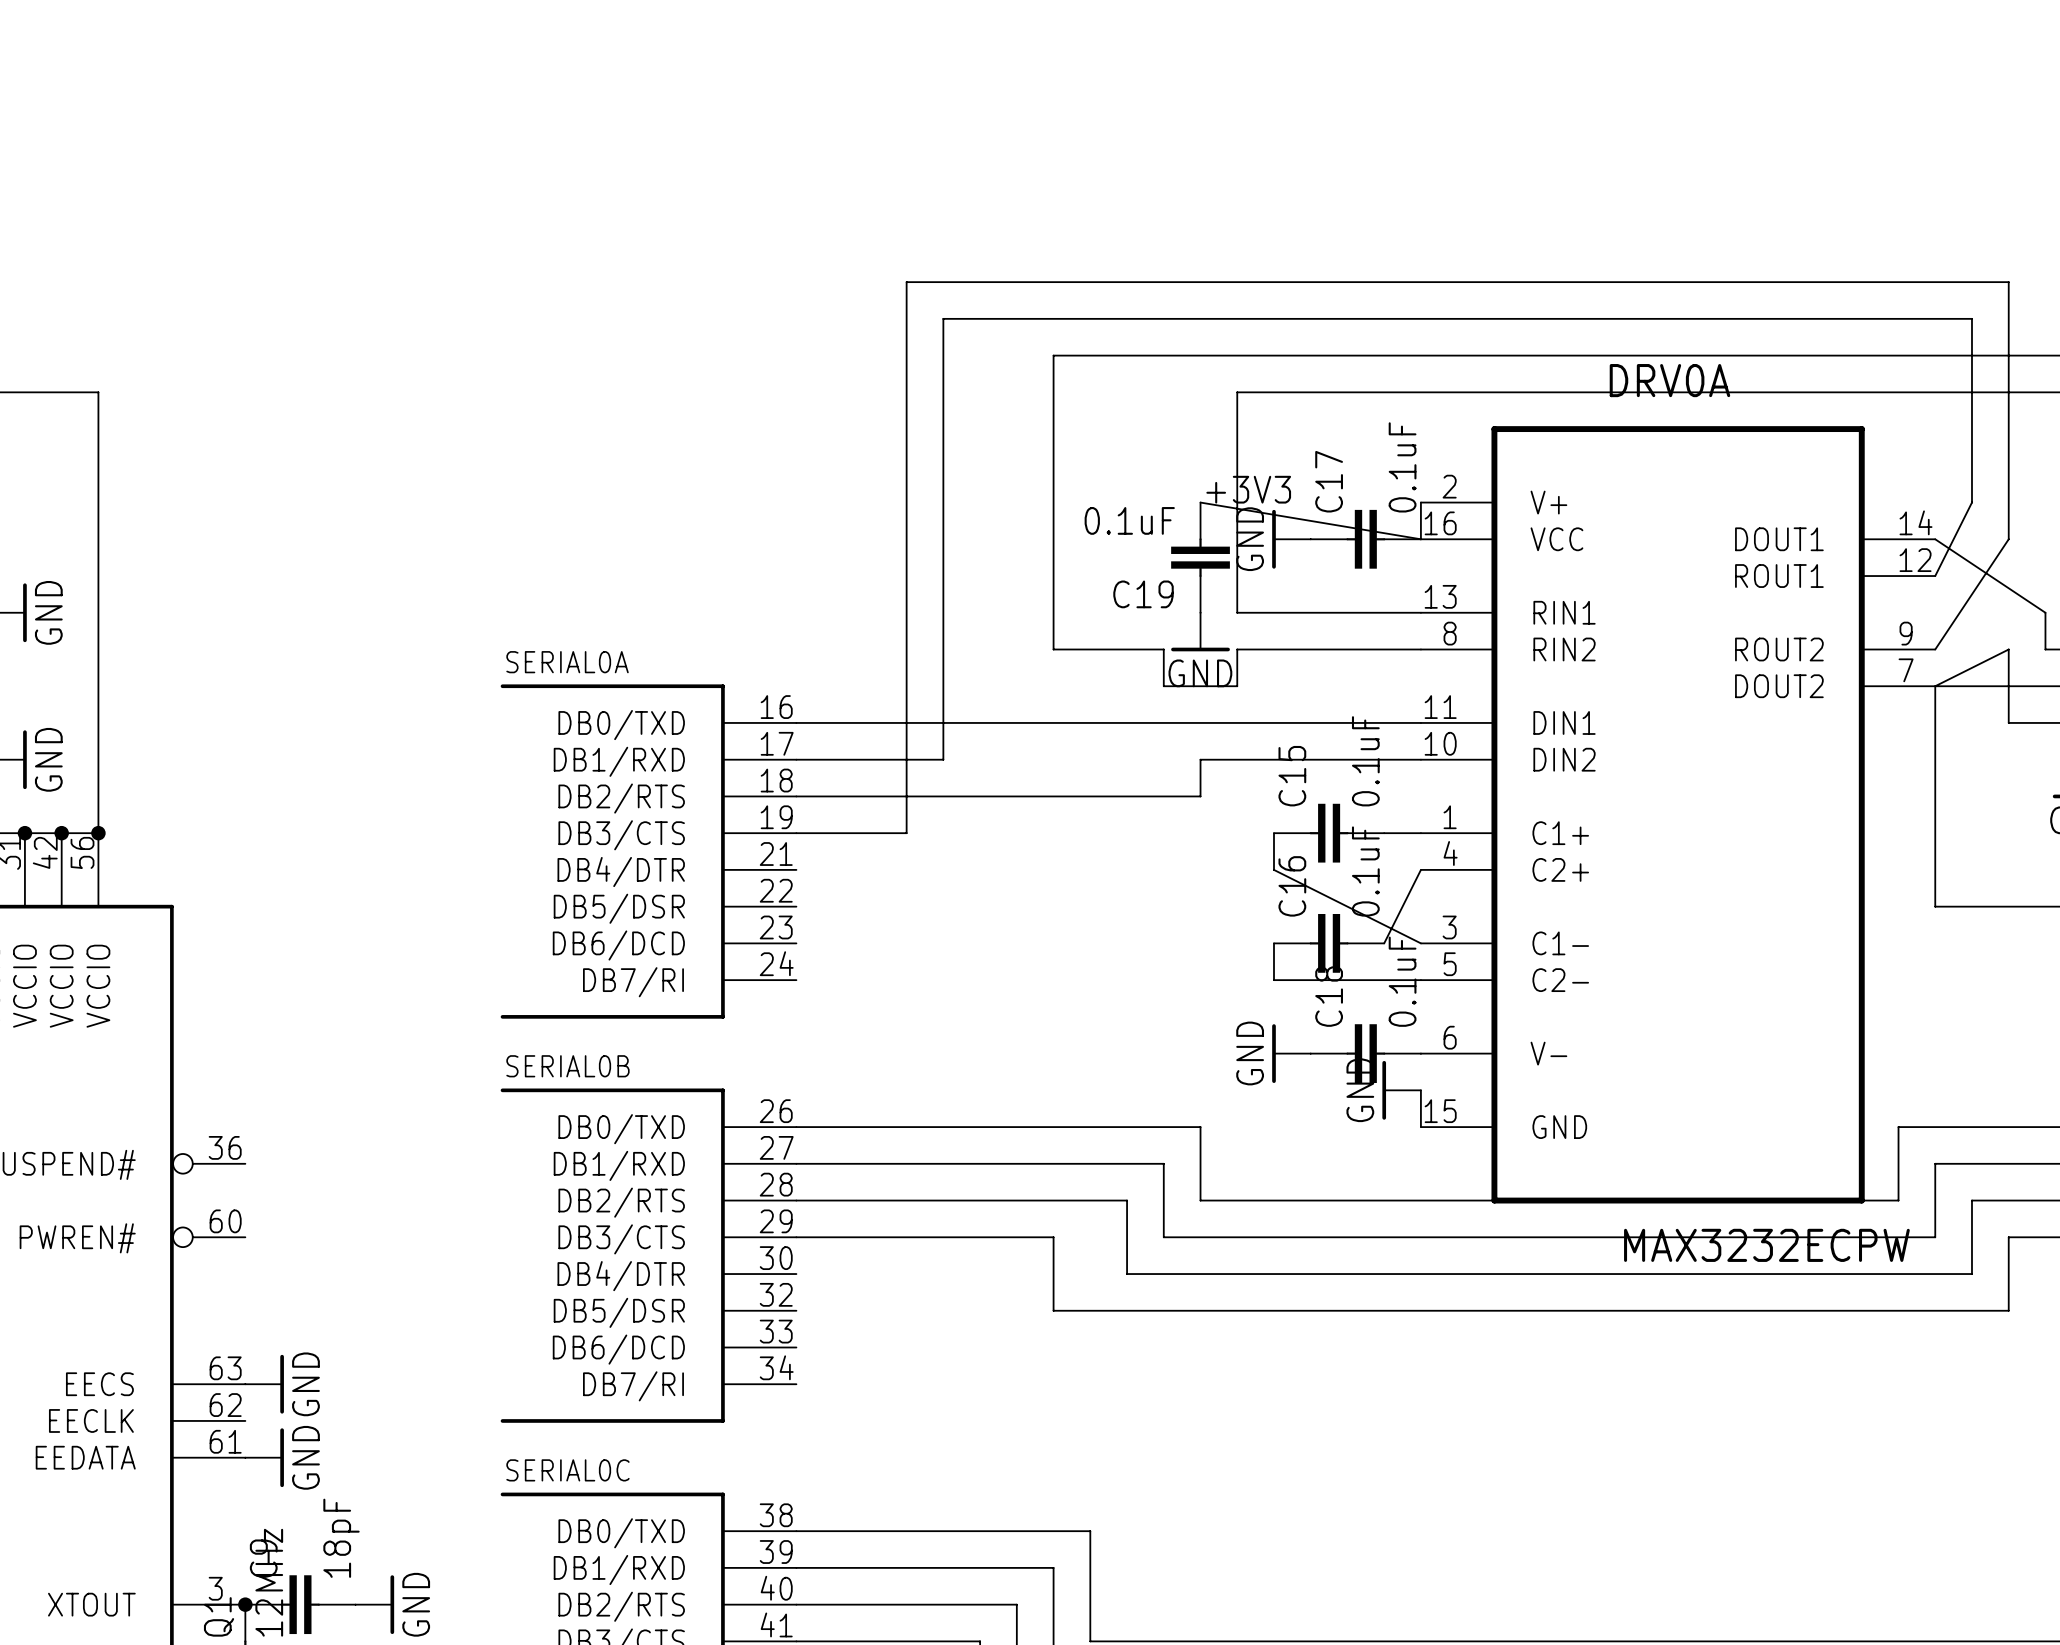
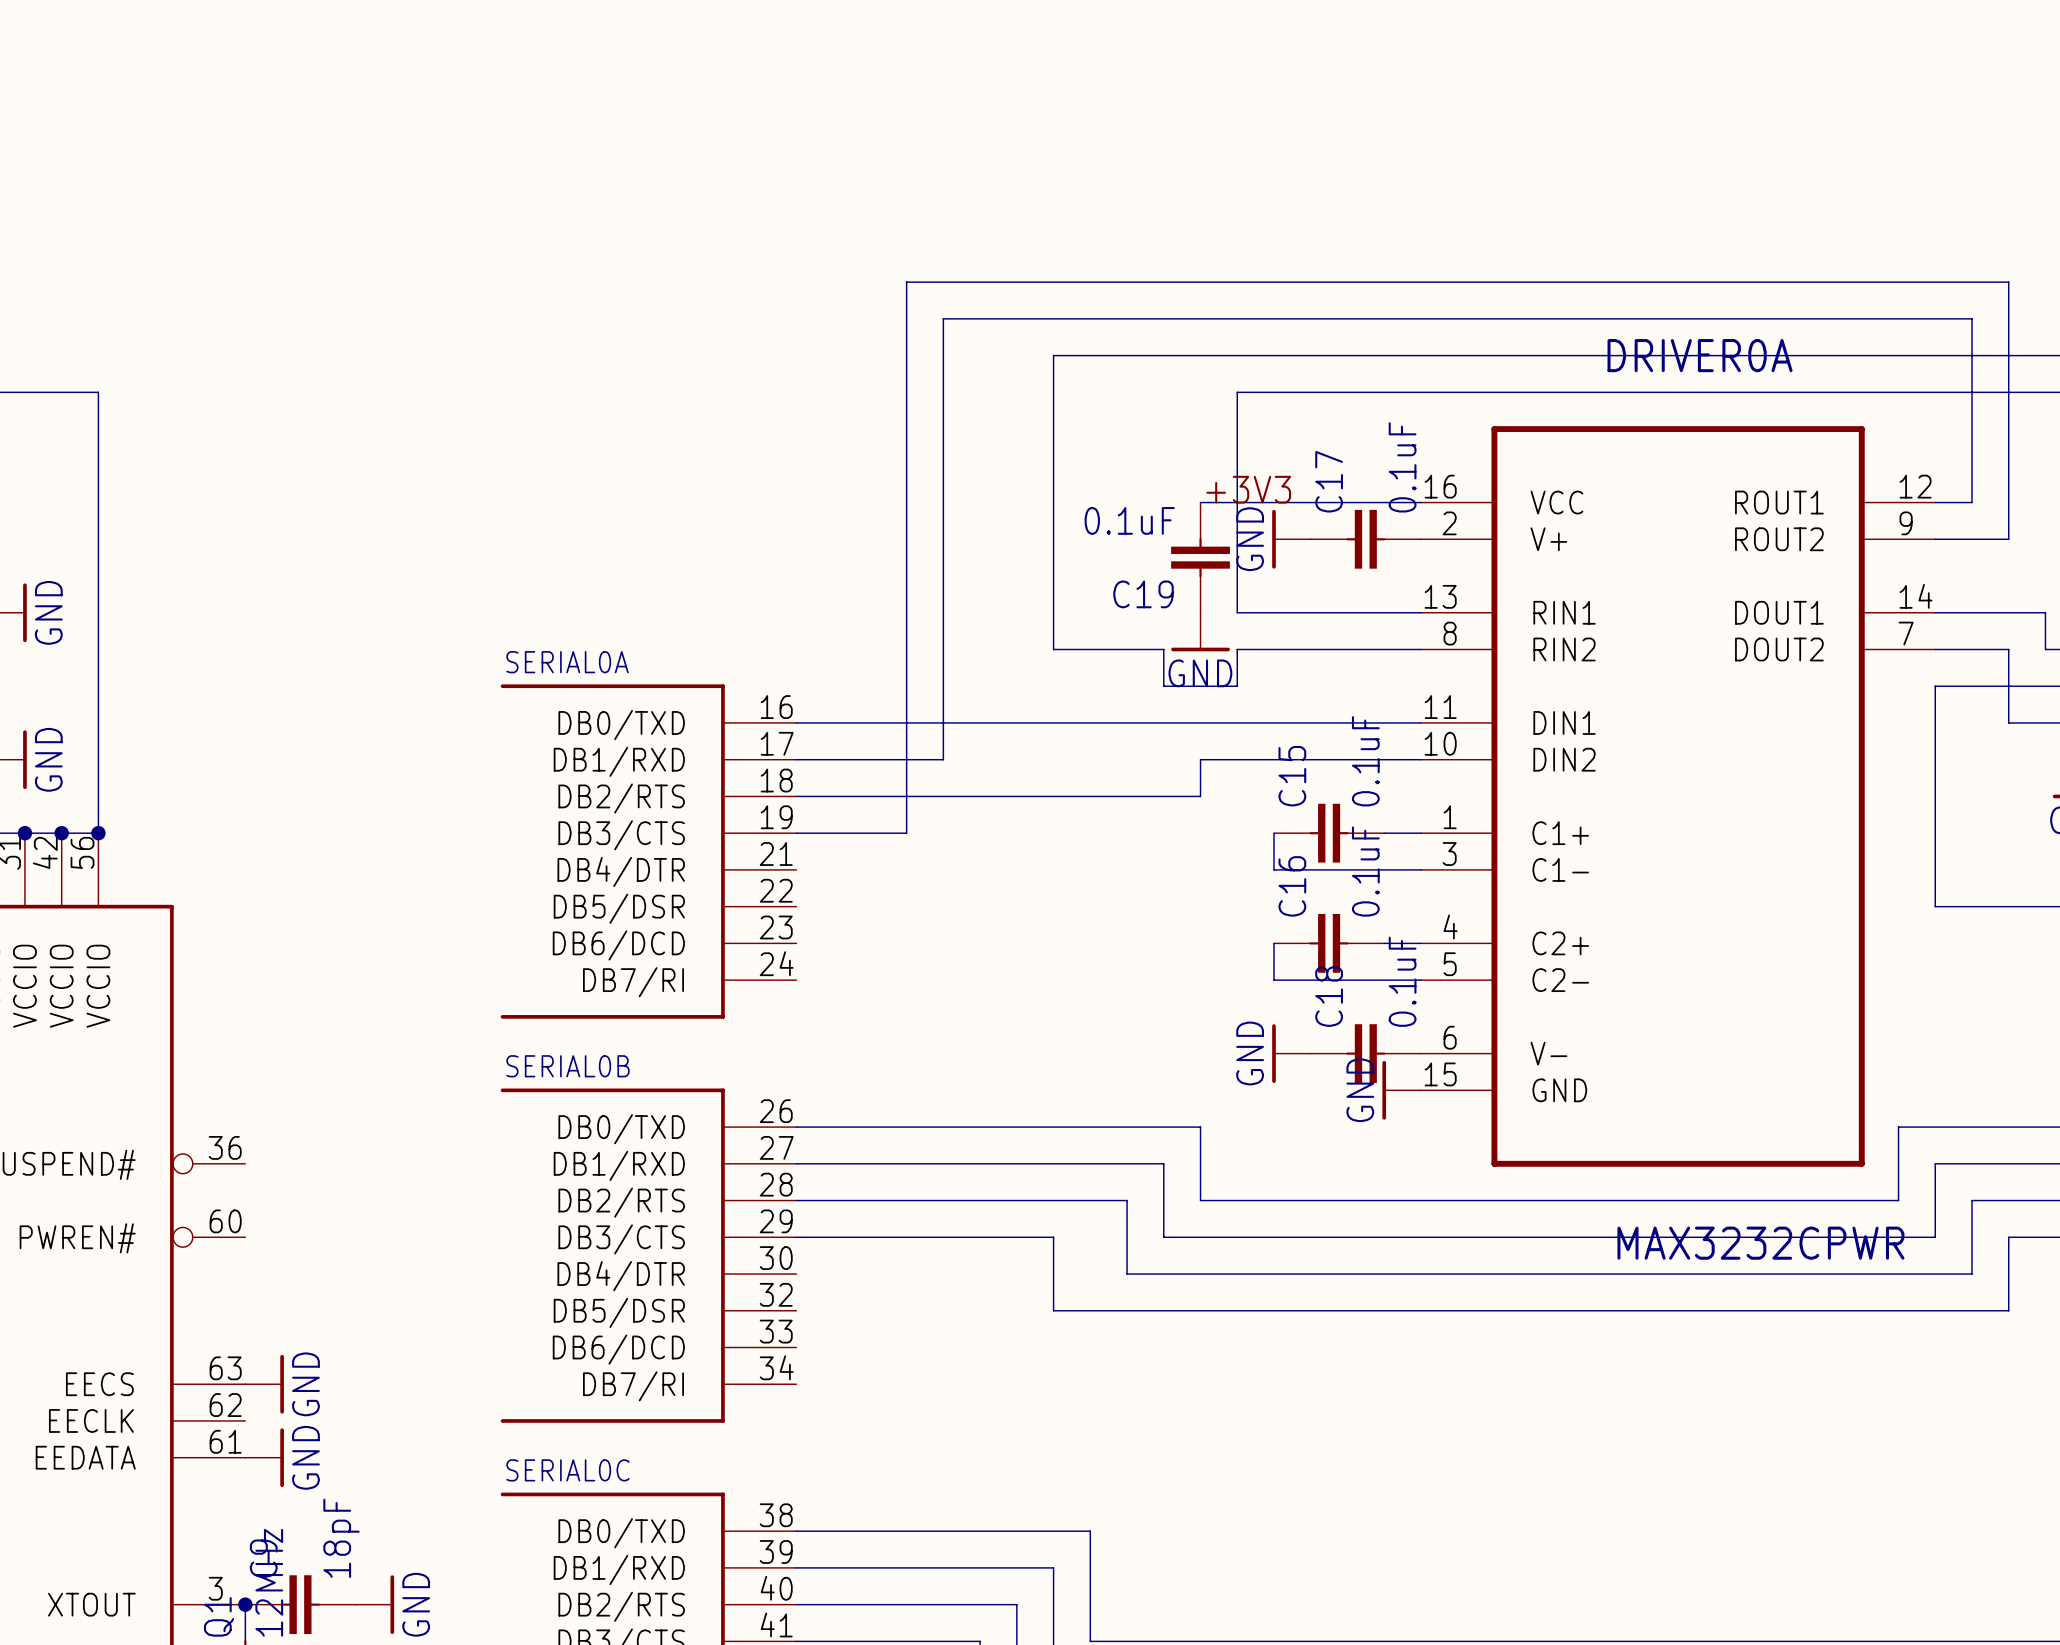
wire: (1200, 502) (1420, 539) (1420, 502) -> (1200, 502) (1420, 502)
wire: (1971, 502) (1935, 576) -> (1971, 502) (1935, 502)
wire: (1935, 539) (2045, 612) -> (1935, 612) (2045, 612)
wire: (2008, 539) (1935, 649) -> (2008, 539) (1935, 539)
wire: (2008, 649) (1935, 686) -> (2008, 649) (1935, 649)
DRIVER0A: none -> MAX3232CPWR (1678, 796)
DRV0A: MAX3232ECPW (1678, 814) -> none
wire: (1273, 869) (1420, 943) -> (1273, 869) (1420, 869)
wire: (1420, 869) (1384, 943) -> (1420, 943) (1384, 943)
wire: (1420, 1090) (1420, 1127) -> none

